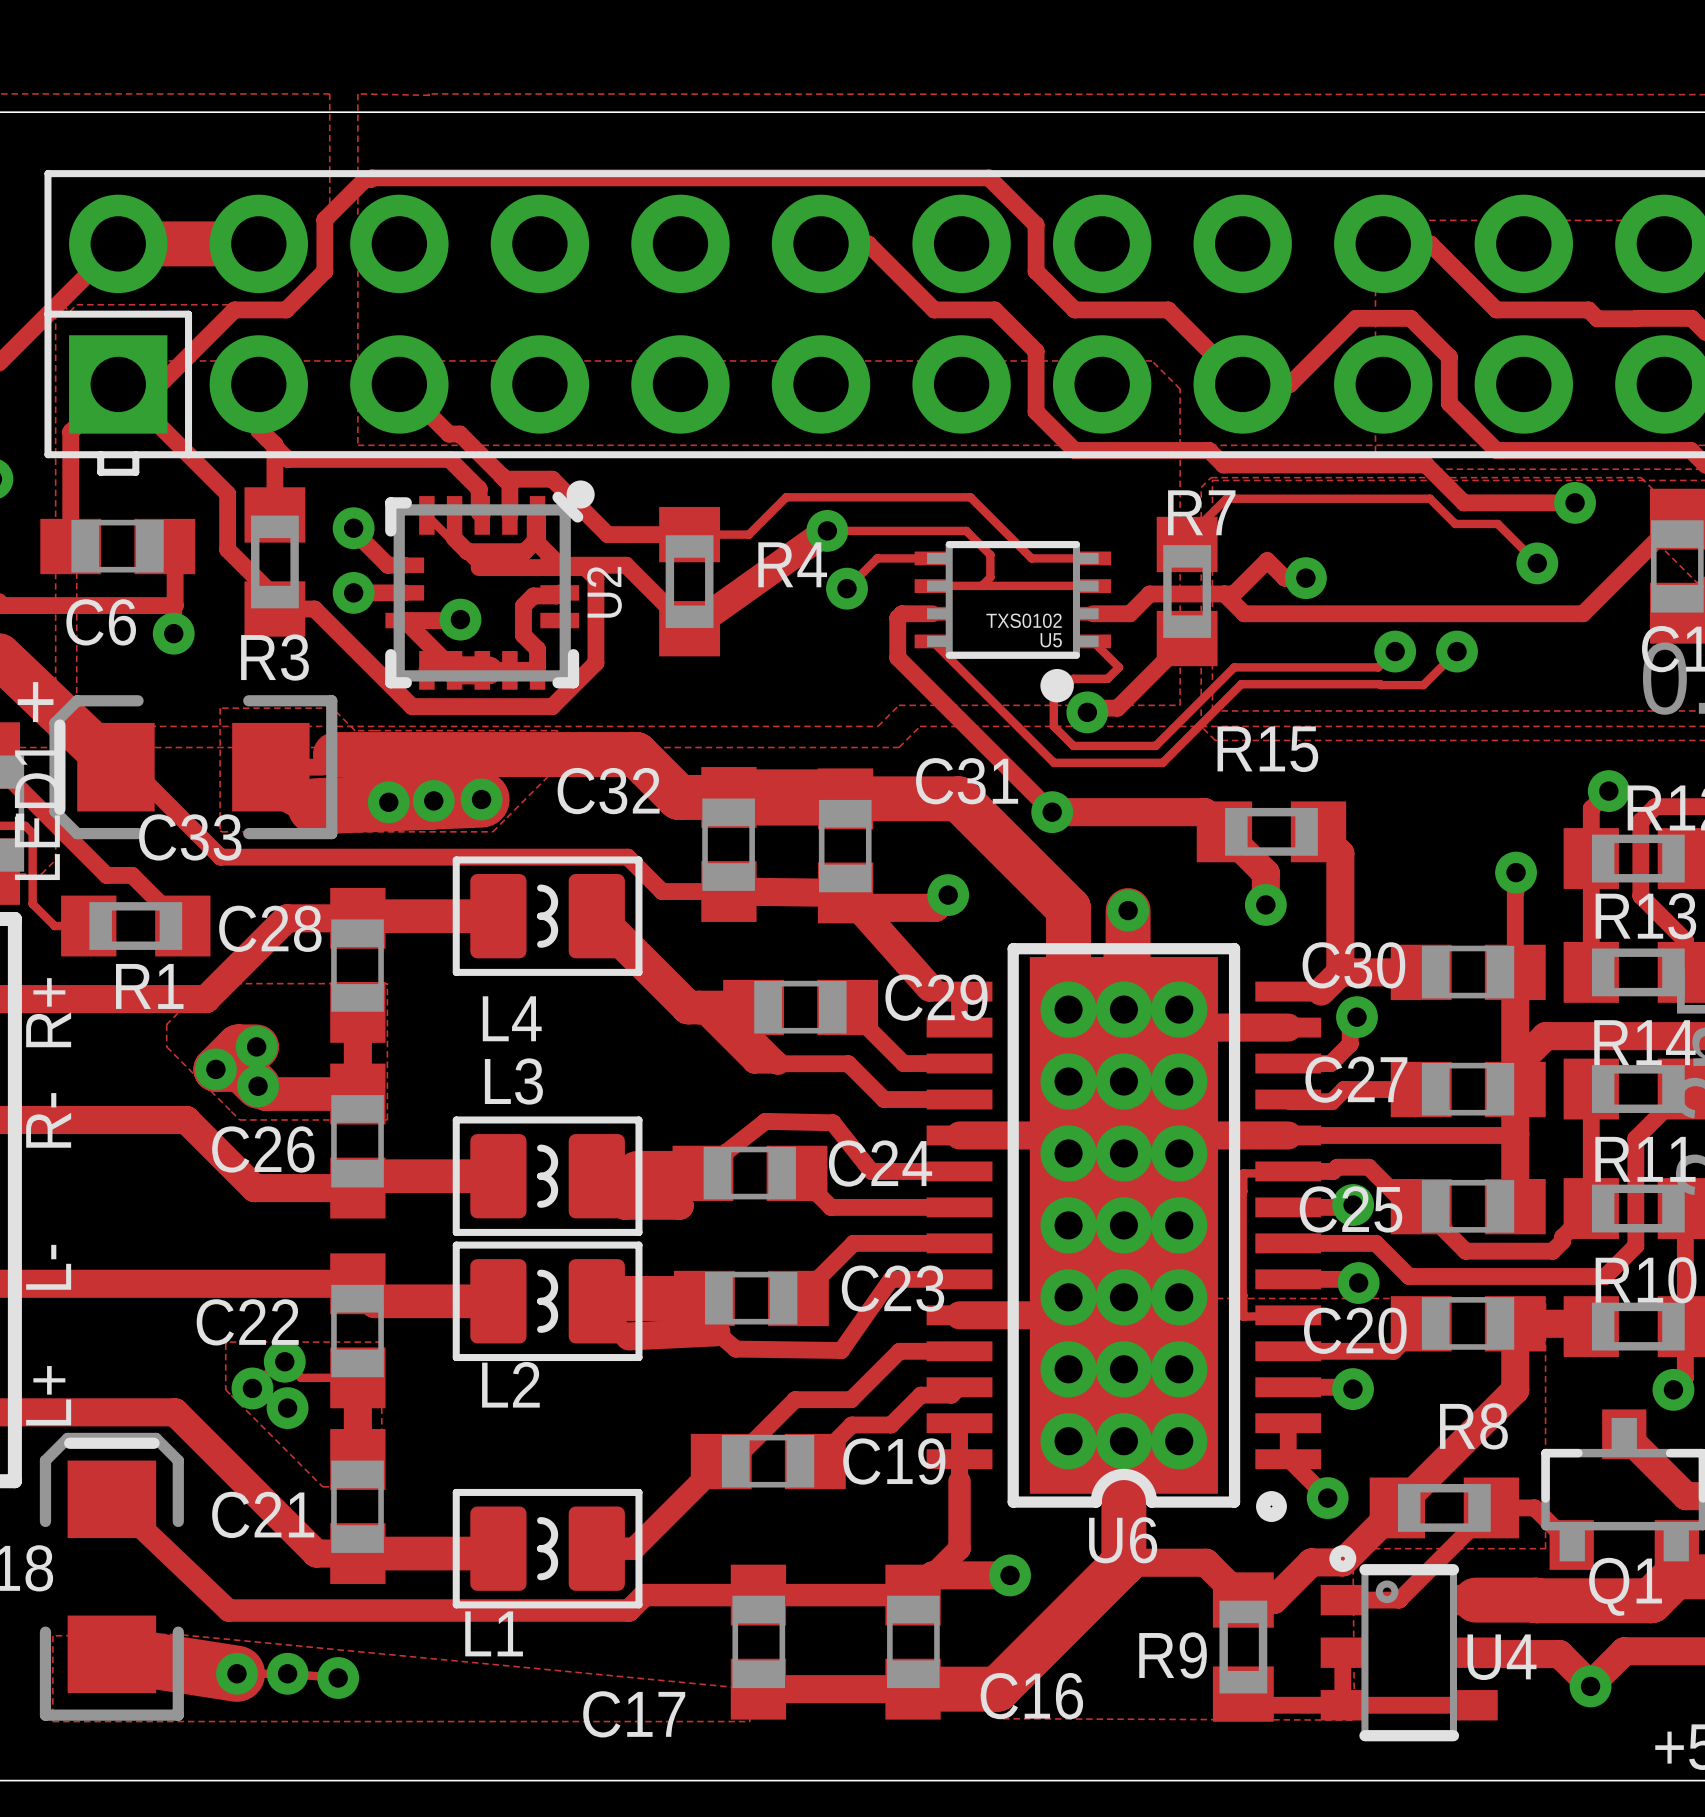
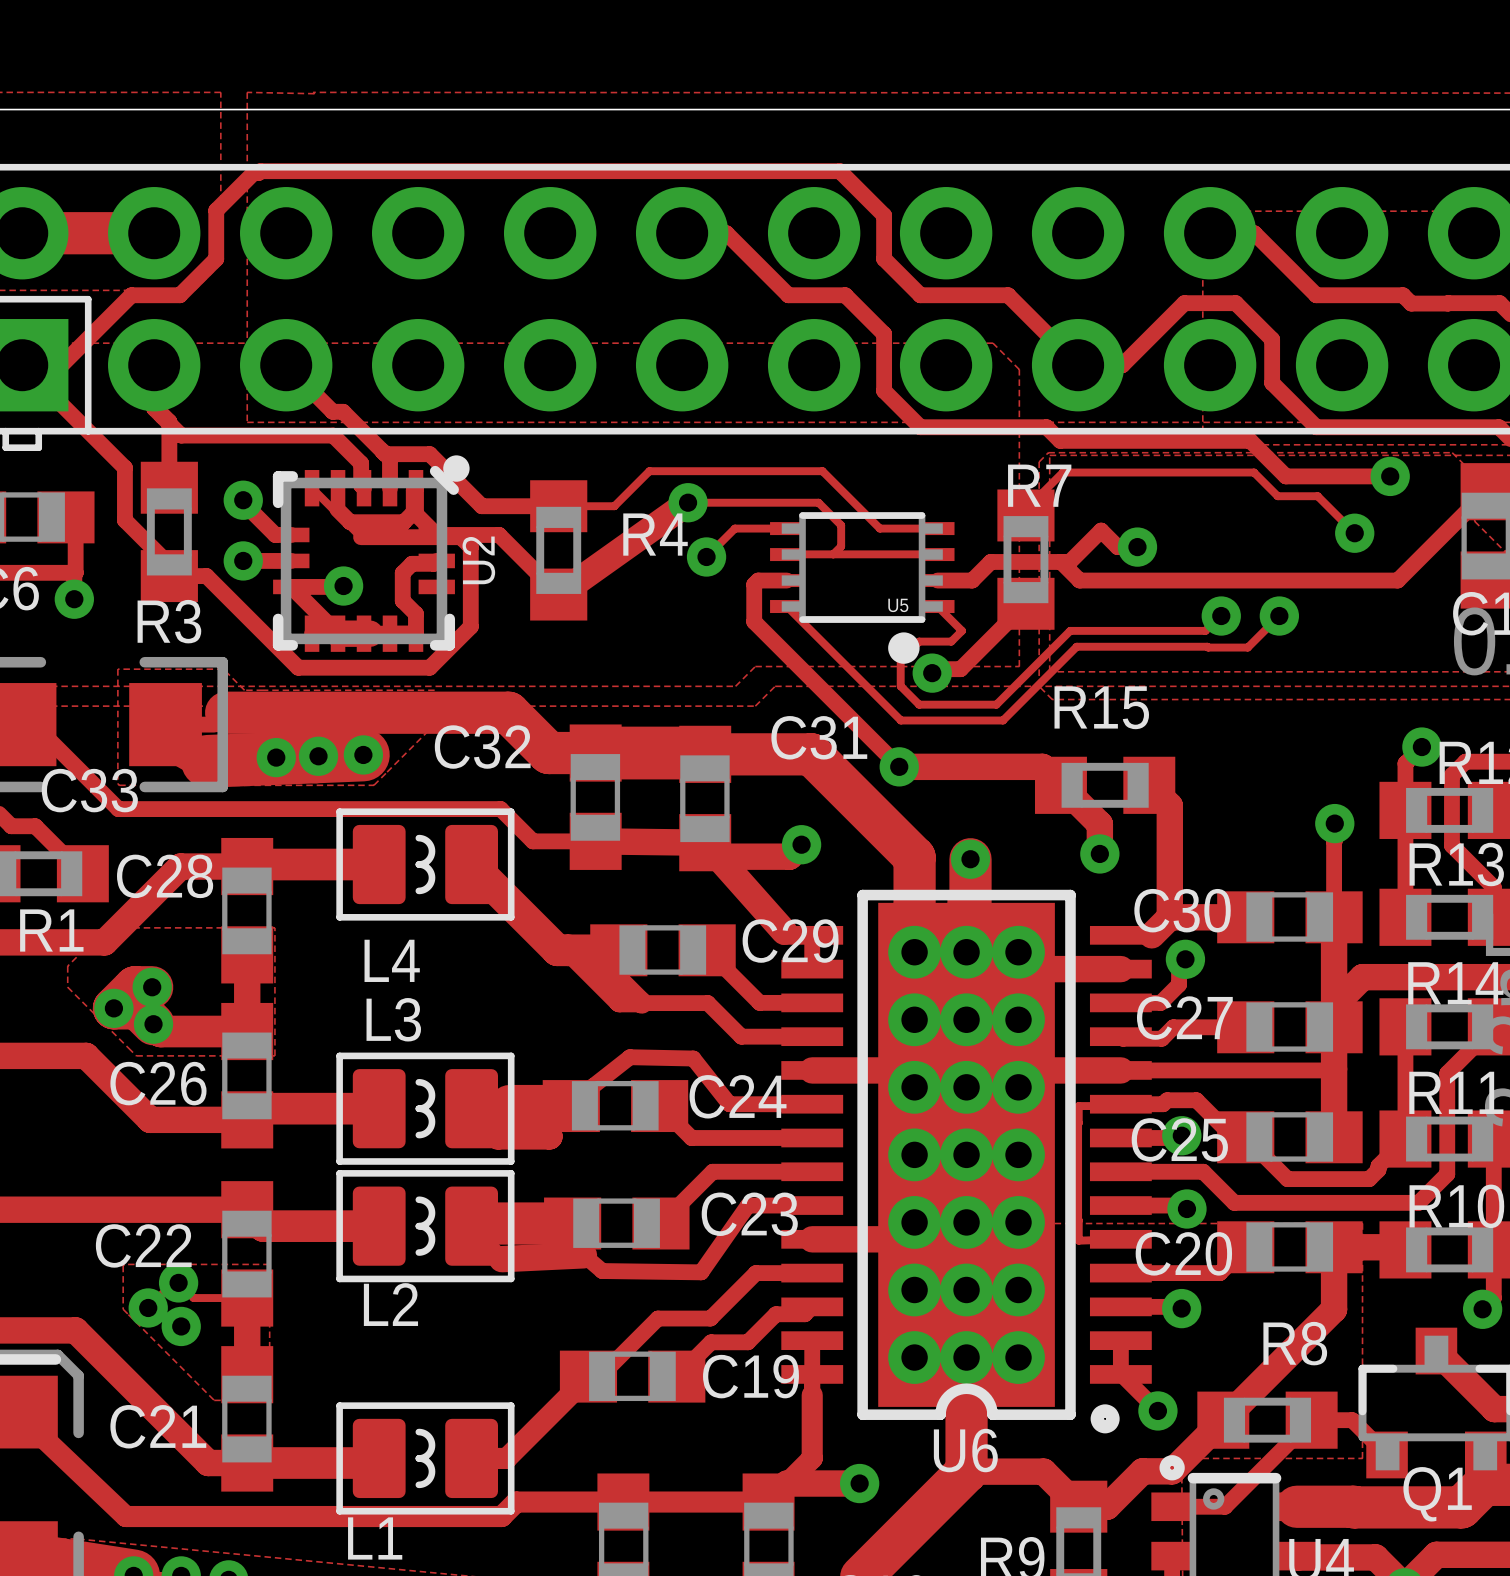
U5 value: TXS0102 (1024, 620) -> none

